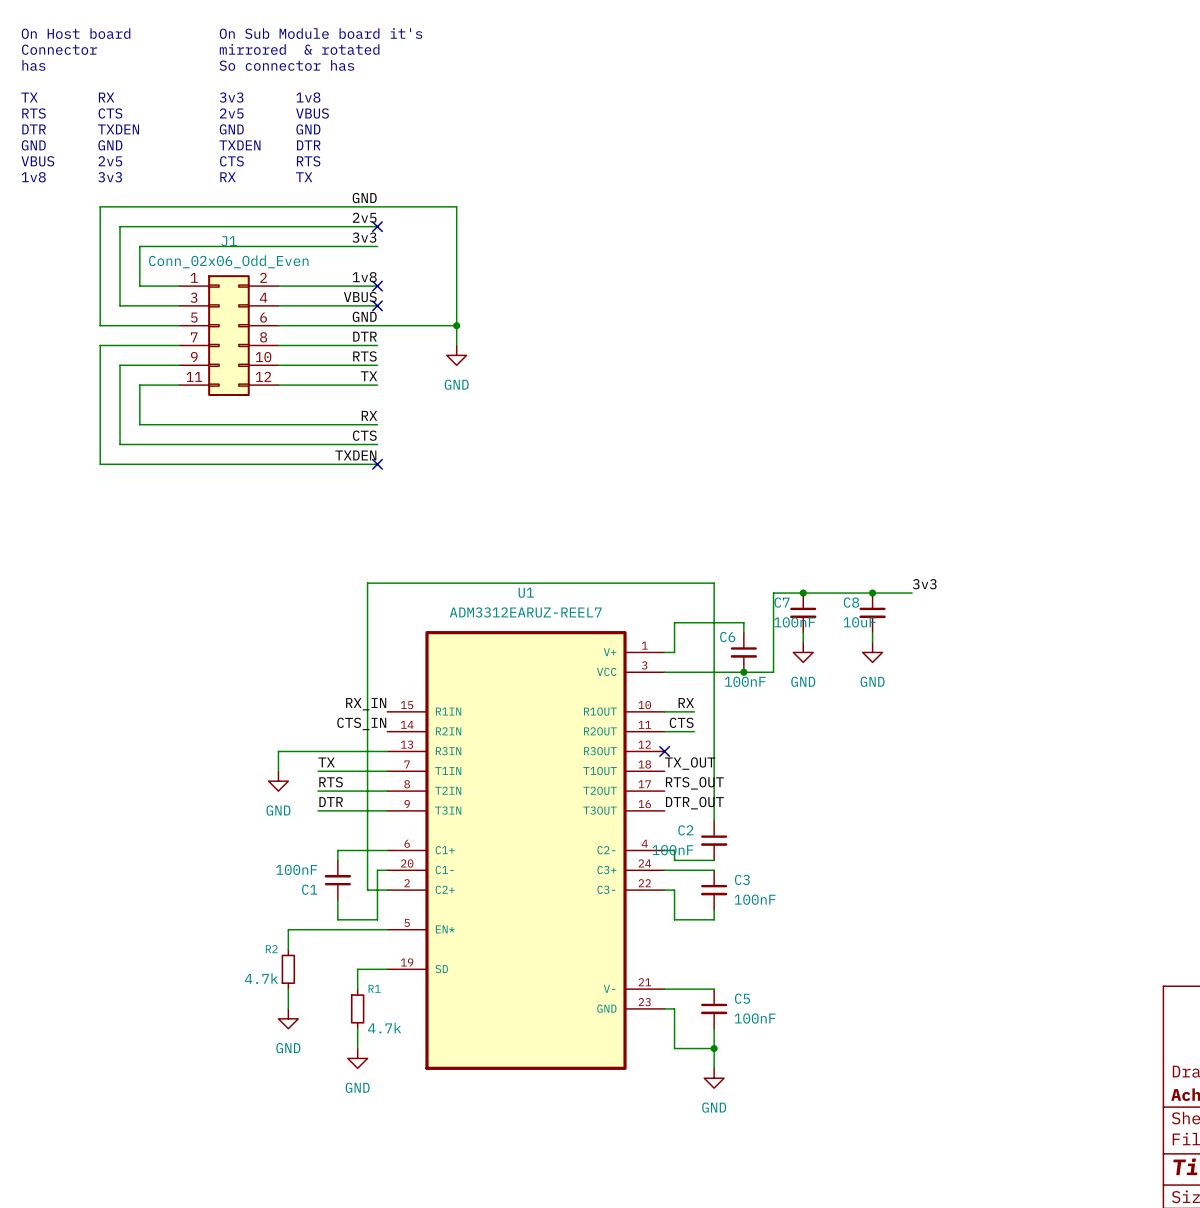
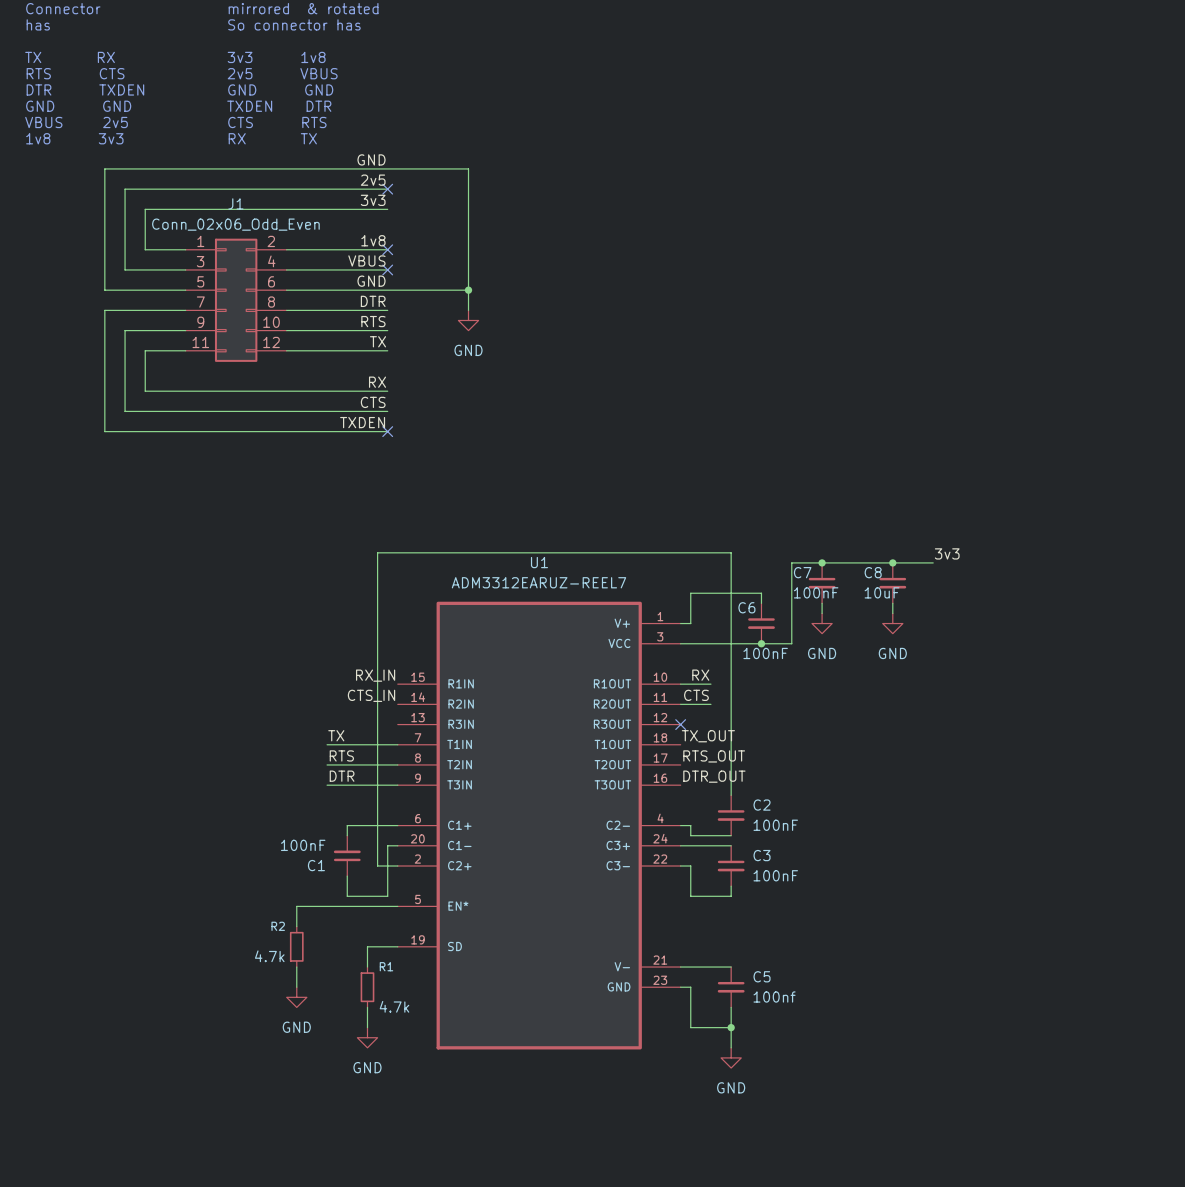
wire: (387, 751) (278, 751) (278, 771) -> none
power symbol: GND (278, 781) -> none
C2 name position: C2 (685, 830) -> C2 (762, 805)
C2 value position: 100nF (672, 850) -> 100nF (775, 825)
C5 value: 100nF (755, 1018) -> 100nf (774, 996)

